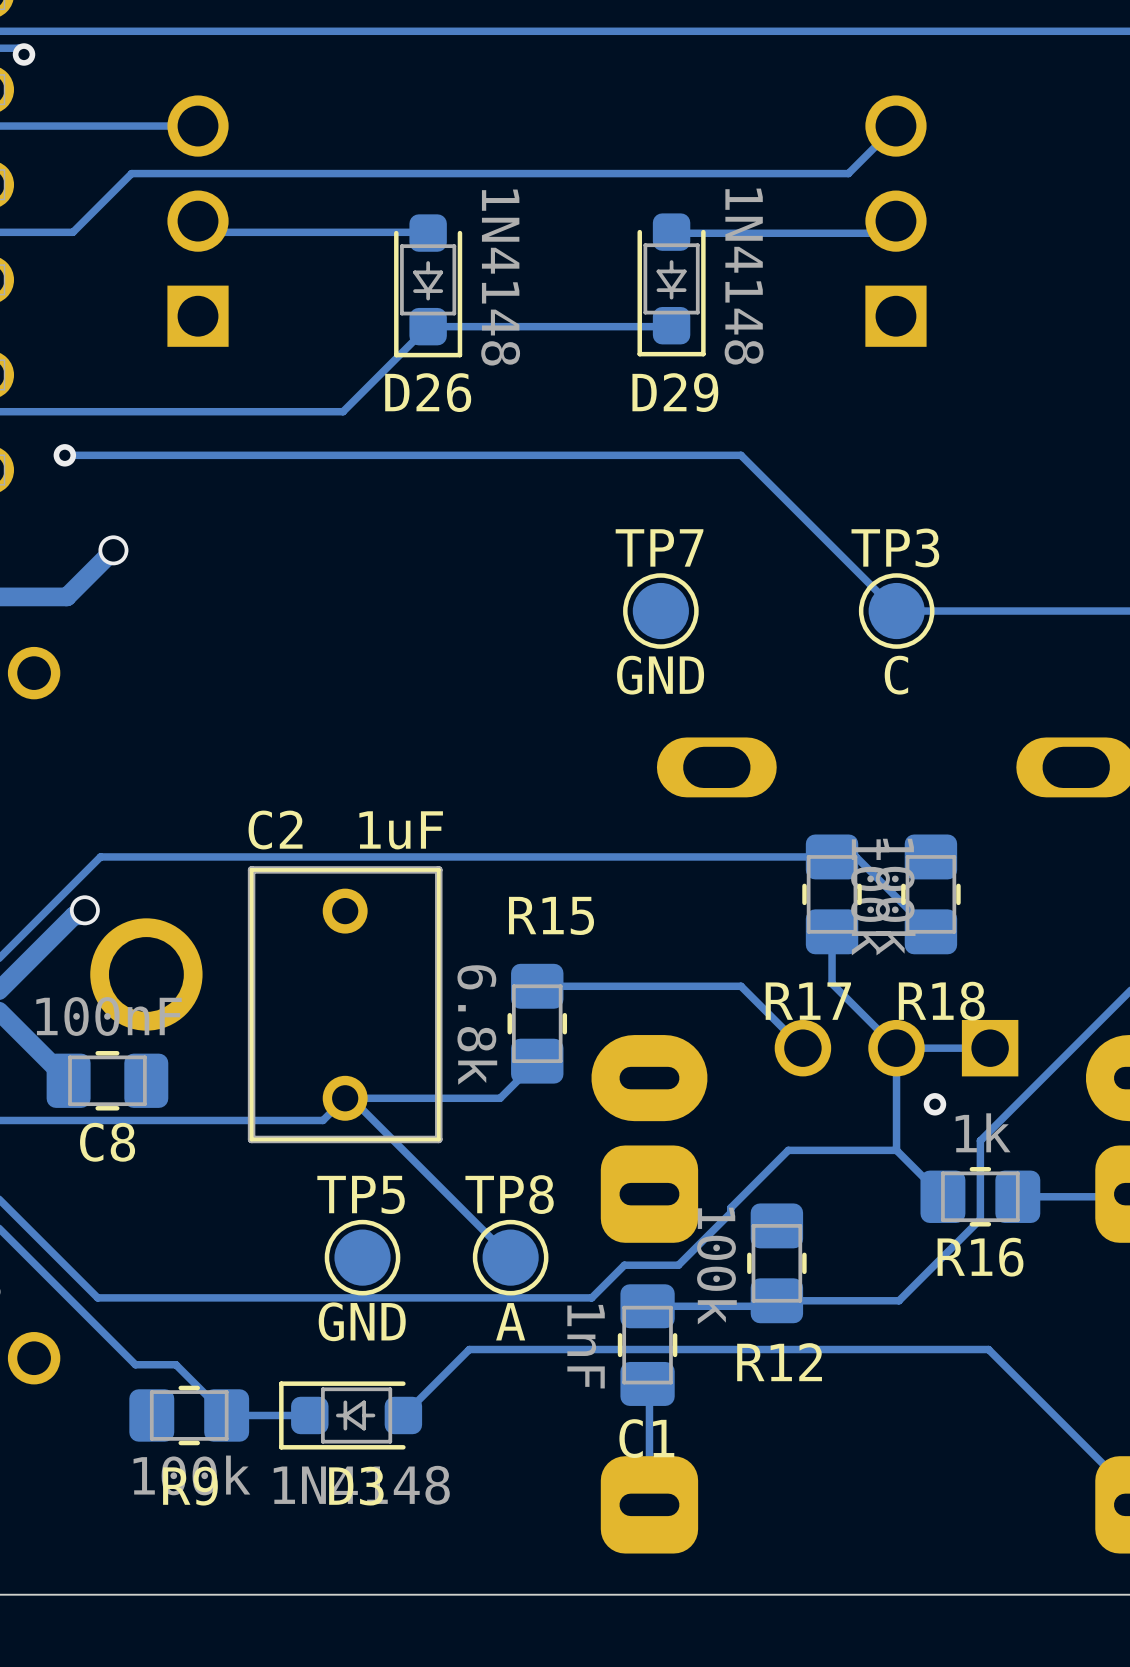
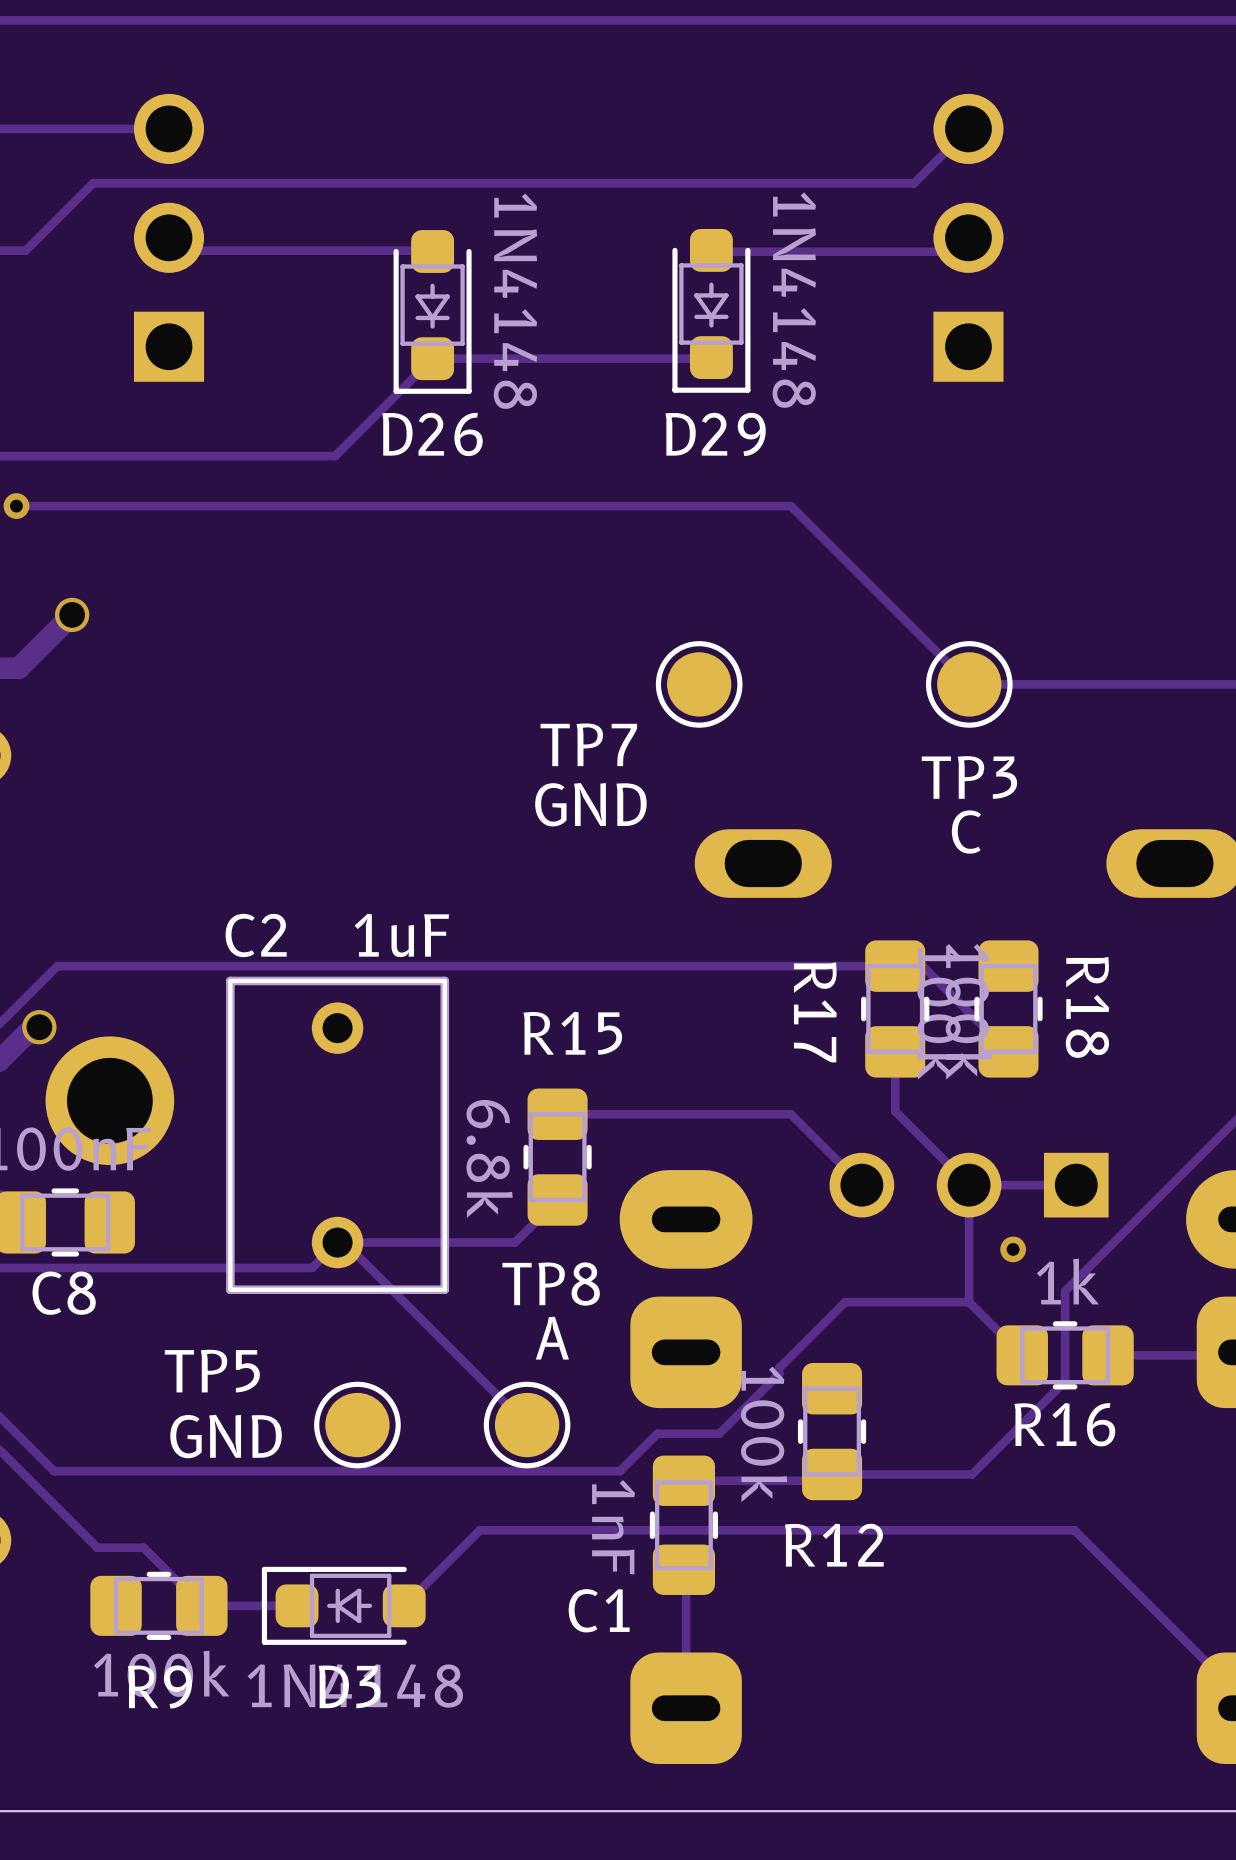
TP7 name position: TP7 (659, 547) -> TP7 (588, 744)
TP3 name position: TP3 (895, 547) -> TP3 (969, 777)
TP7 value position: GND (660, 675) -> GND (590, 804)
TP3 value position: C (896, 675) -> C (966, 832)
R17 name rotation: 0° (808, 1001) -> 90° clockwise (815, 1012)
R18 name rotation: 0° (941, 1001) -> 90° clockwise (1087, 1007)
TP5 name position: TP5 (361, 1194) -> TP5 (212, 1371)
TP8 name position: TP8 (509, 1194) -> TP8 (551, 1284)
TP5 value position: GND (362, 1321) -> GND (226, 1436)
TP8 value position: A (510, 1321) -> A (552, 1338)
C1 name position: C1 (646, 1438) -> C1 (599, 1610)

